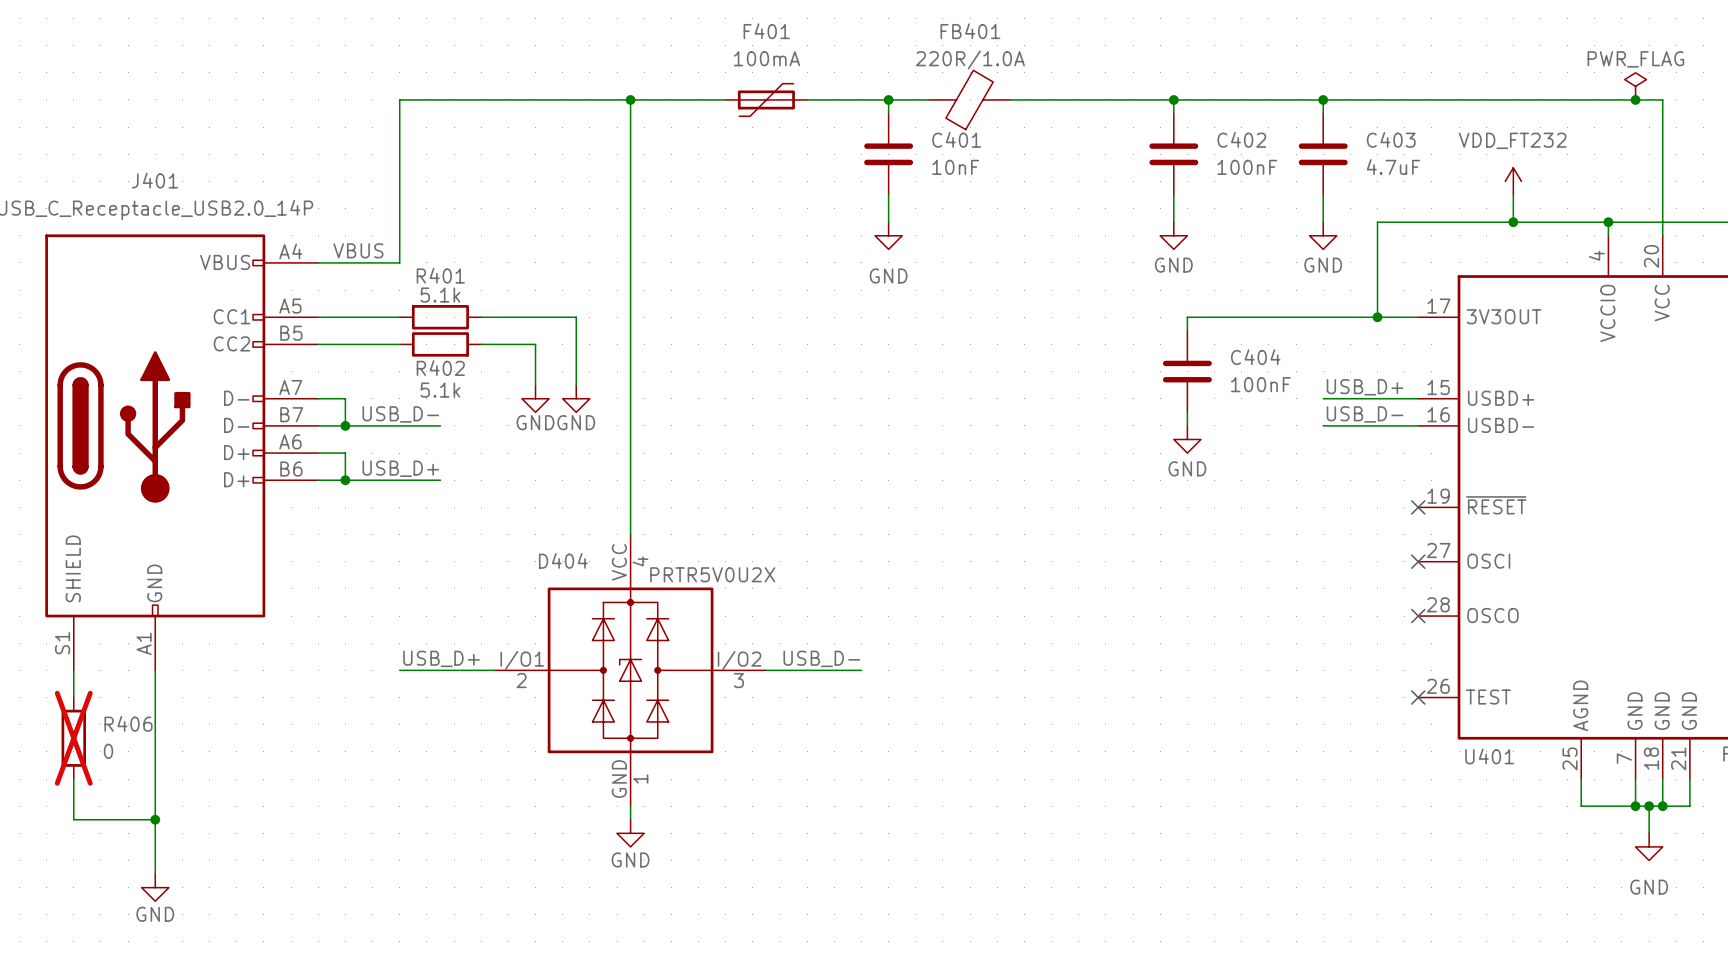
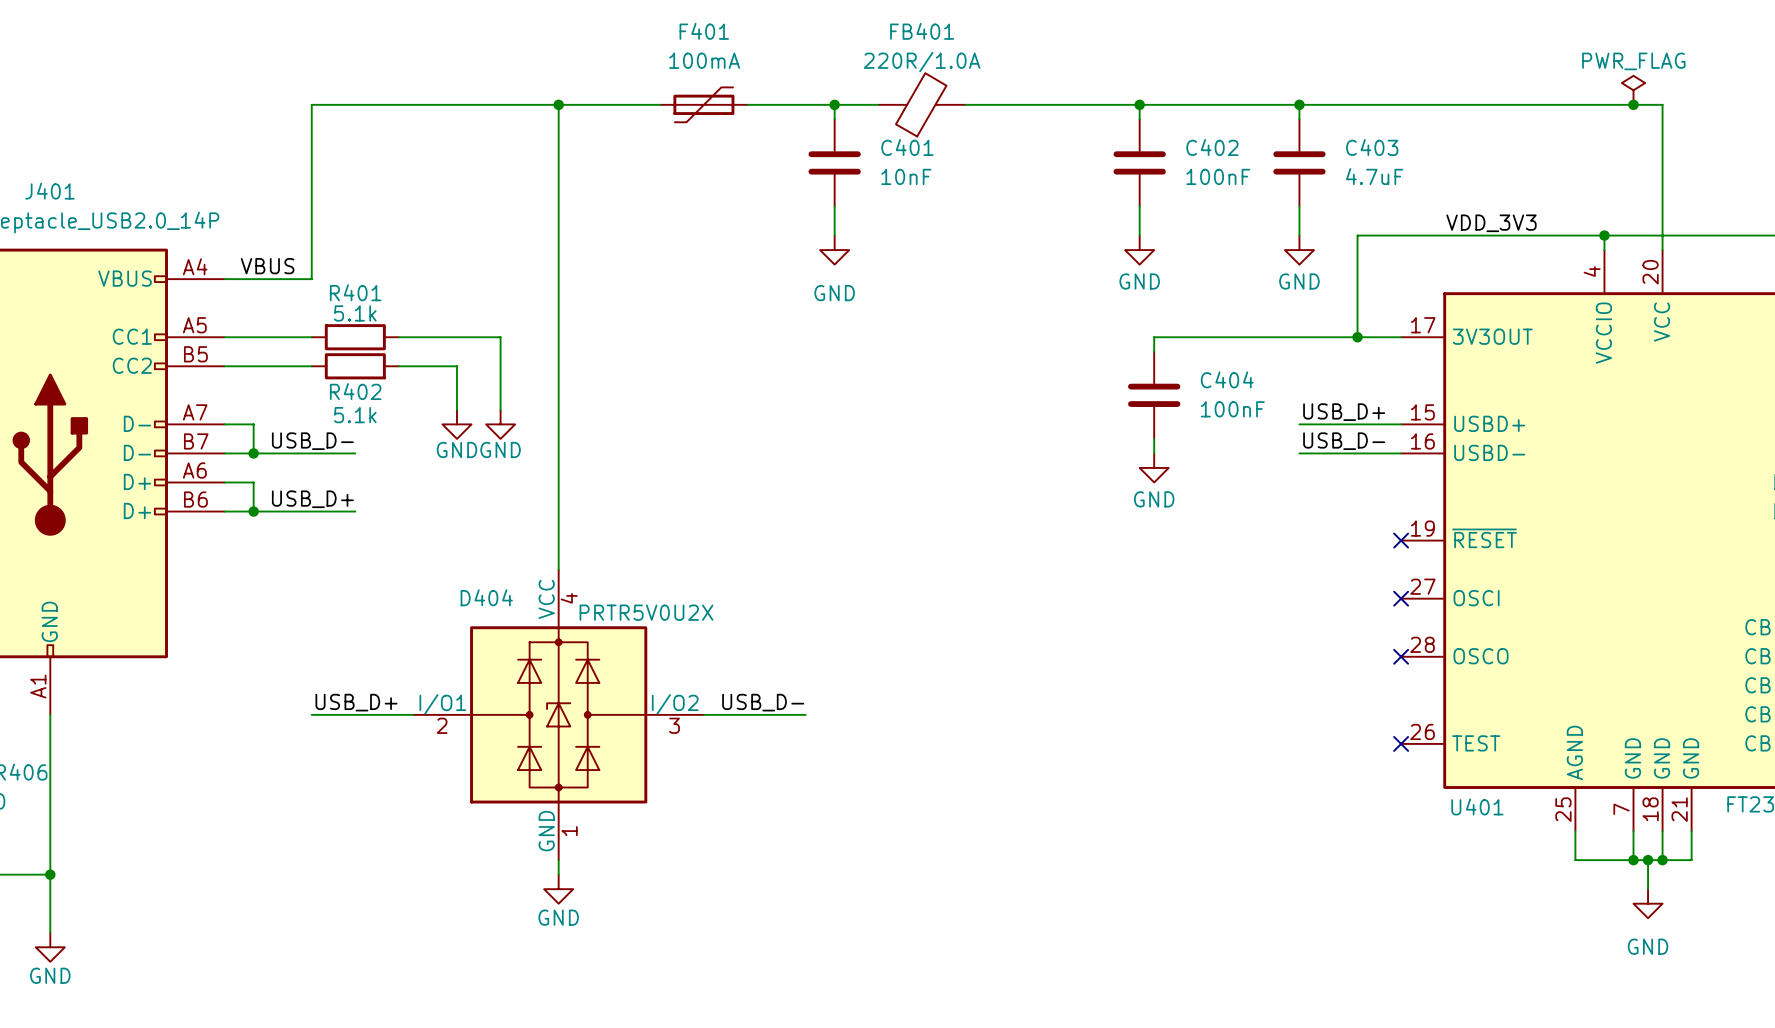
power symbol: VDD_FT232 (1513, 181) -> none
wire: (1513, 195) (1513, 222) -> none
label: none -> VDD_3V3 (1491, 223)
junction: (1513, 222) -> none

